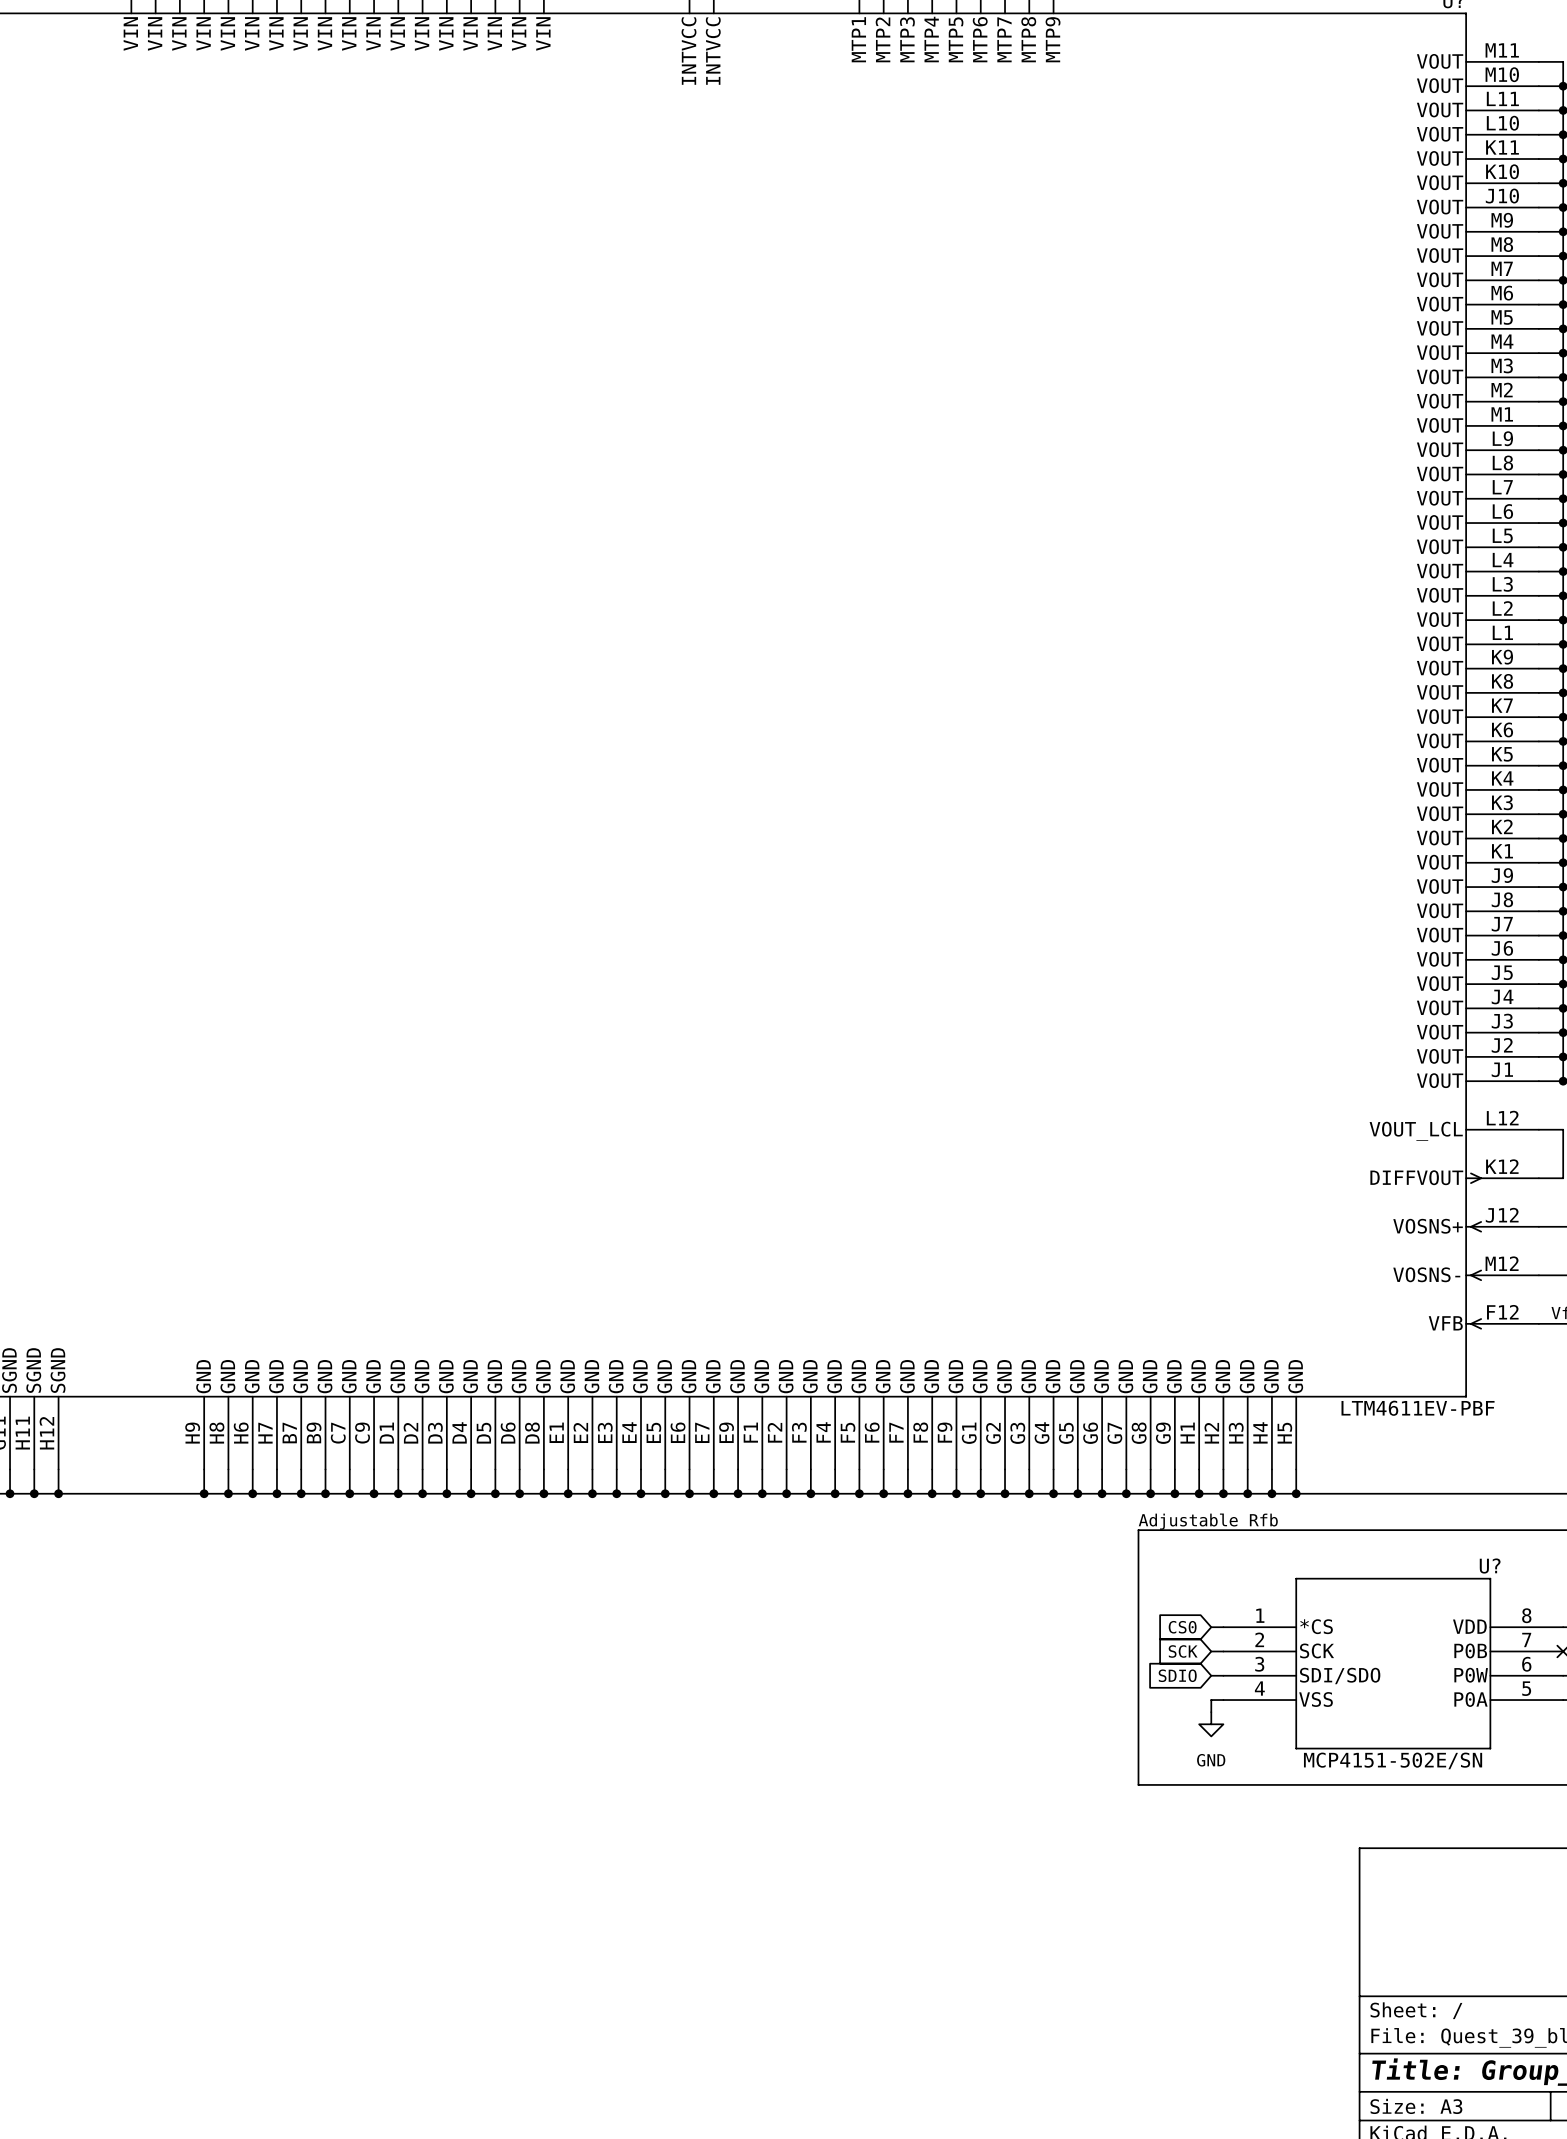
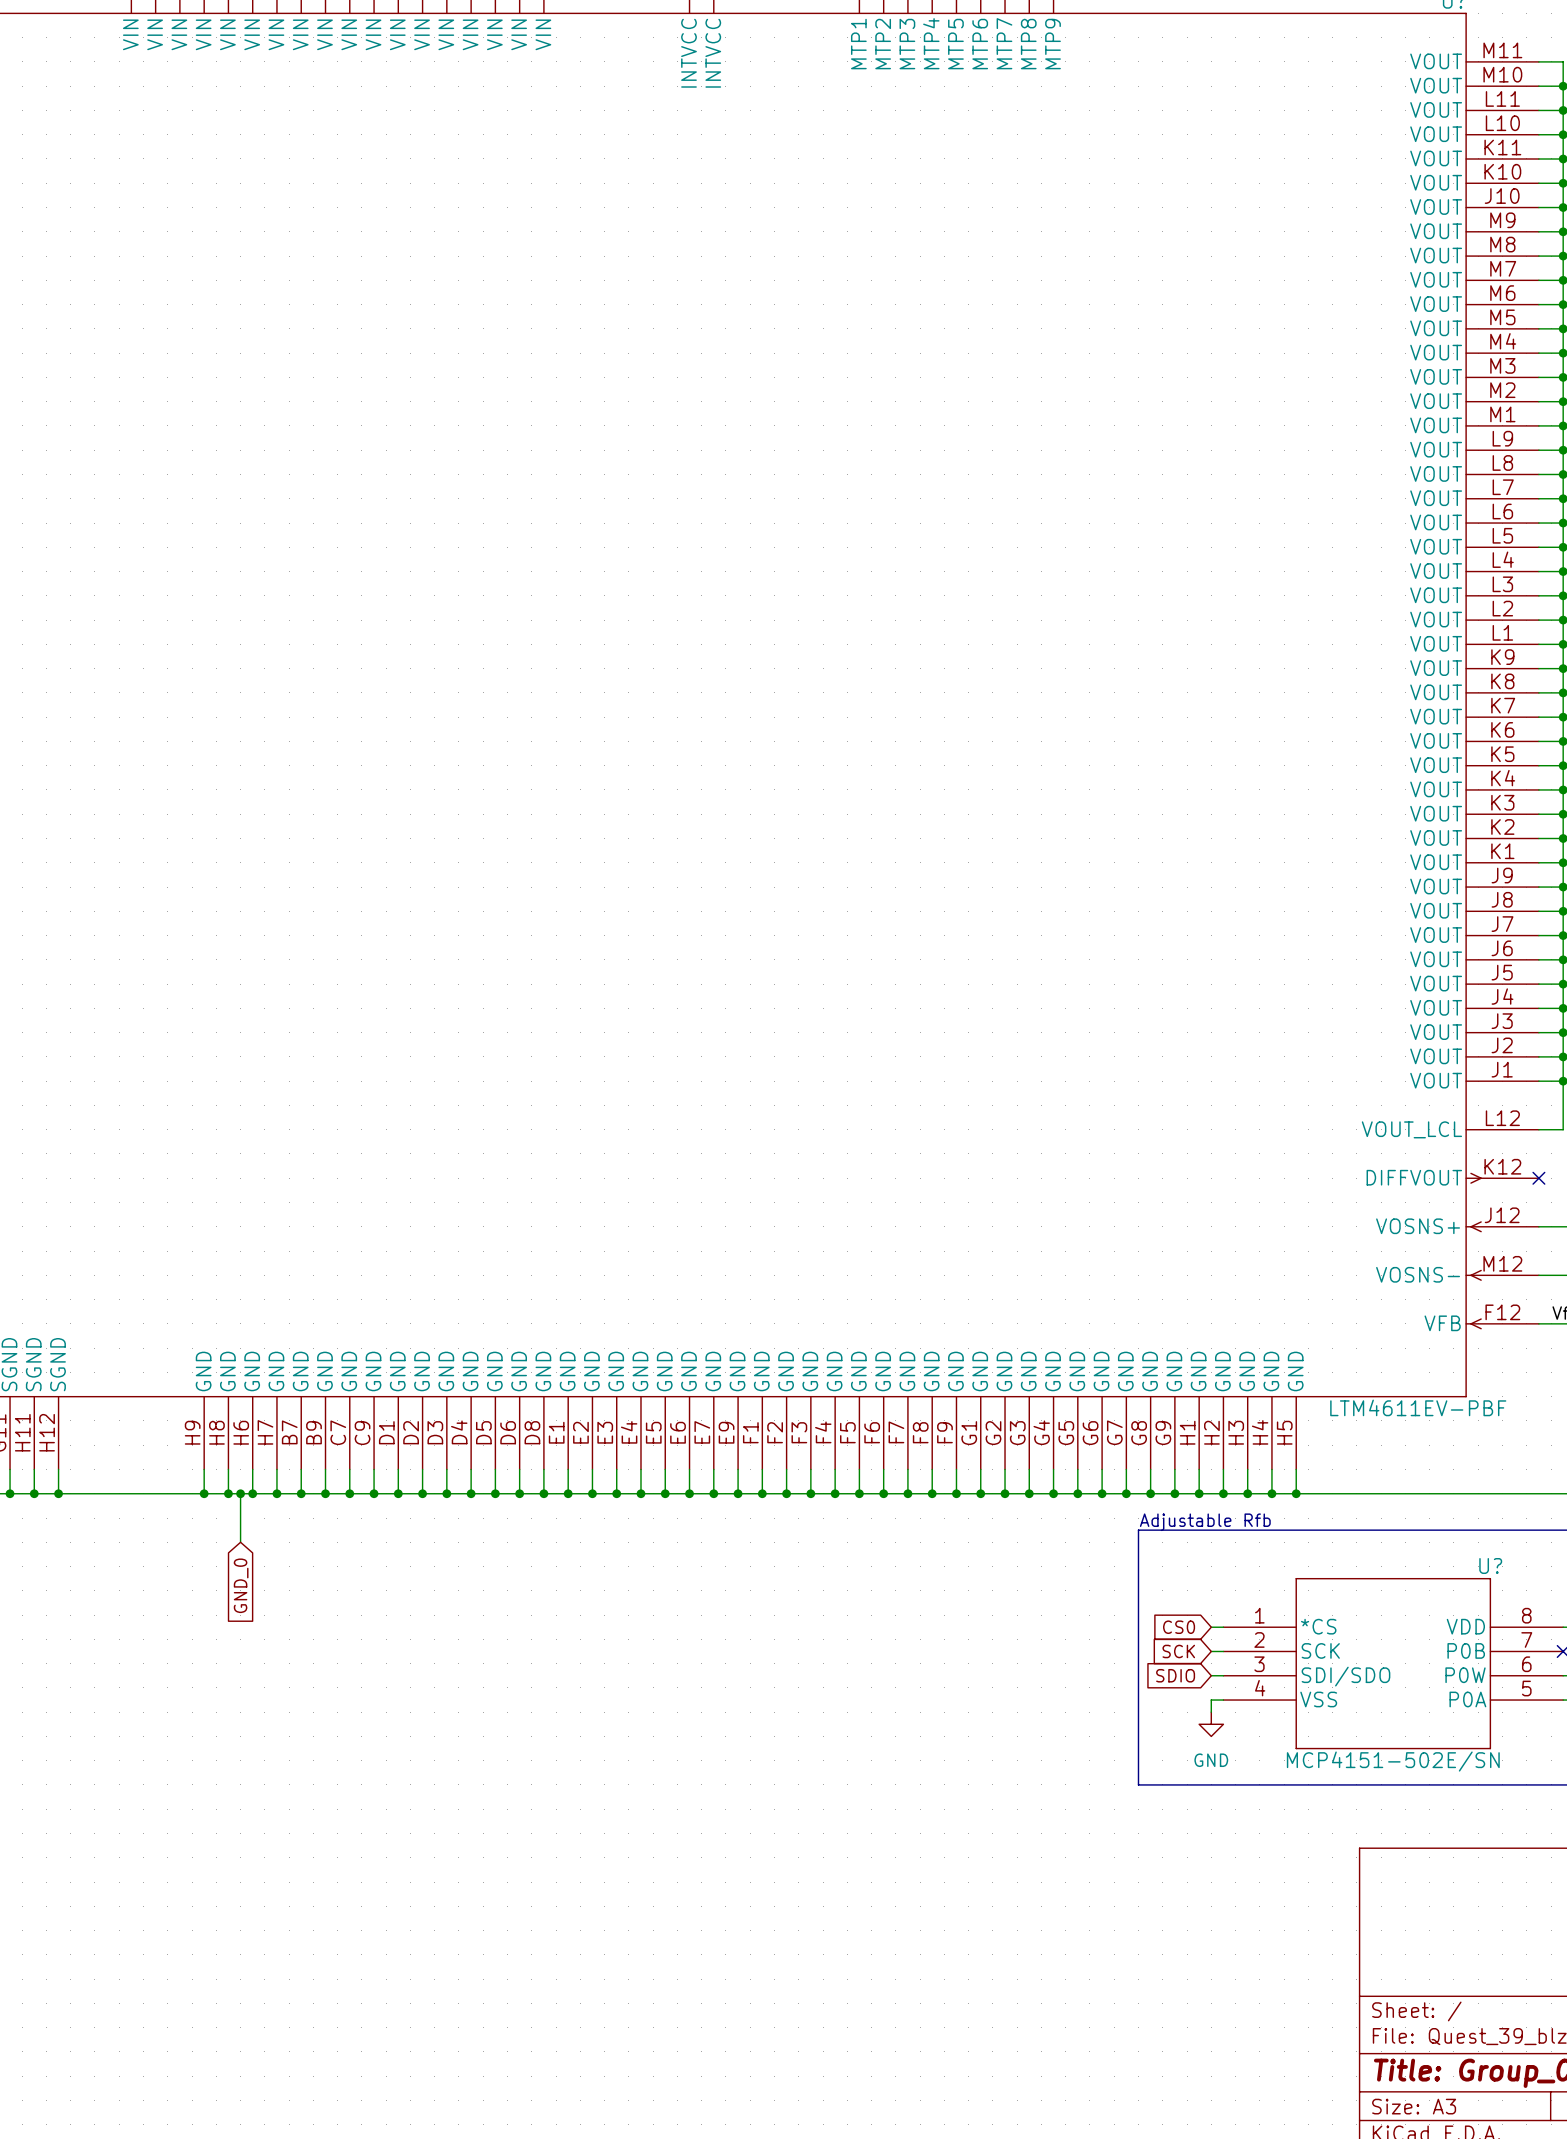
wire: (1563, 1129) (1563, 1178) (1538, 1178) -> (1563, 1129) (1563, 1081)
no-connect mark: none -> (1538, 1178)
wire: none -> (240, 1493) (240, 1542)
junction: none -> (240, 1493)
global label: none -> GND_0 (241, 1585)

